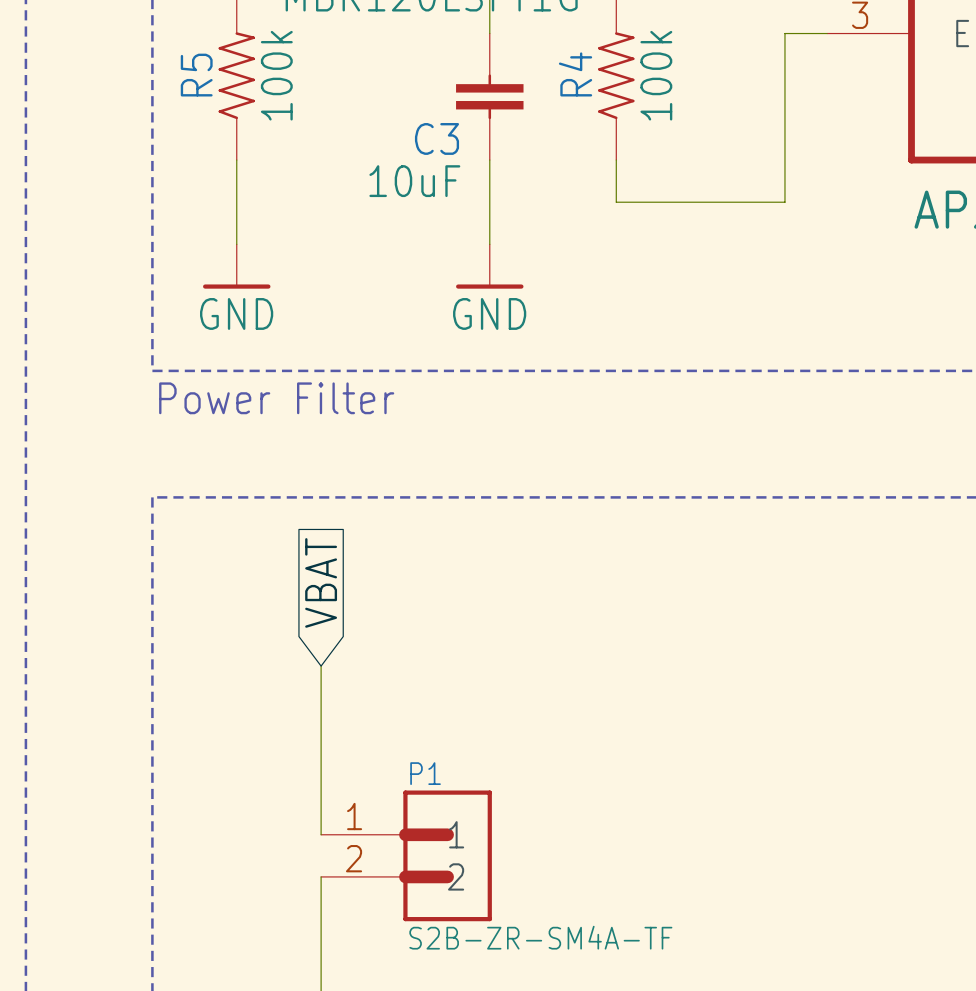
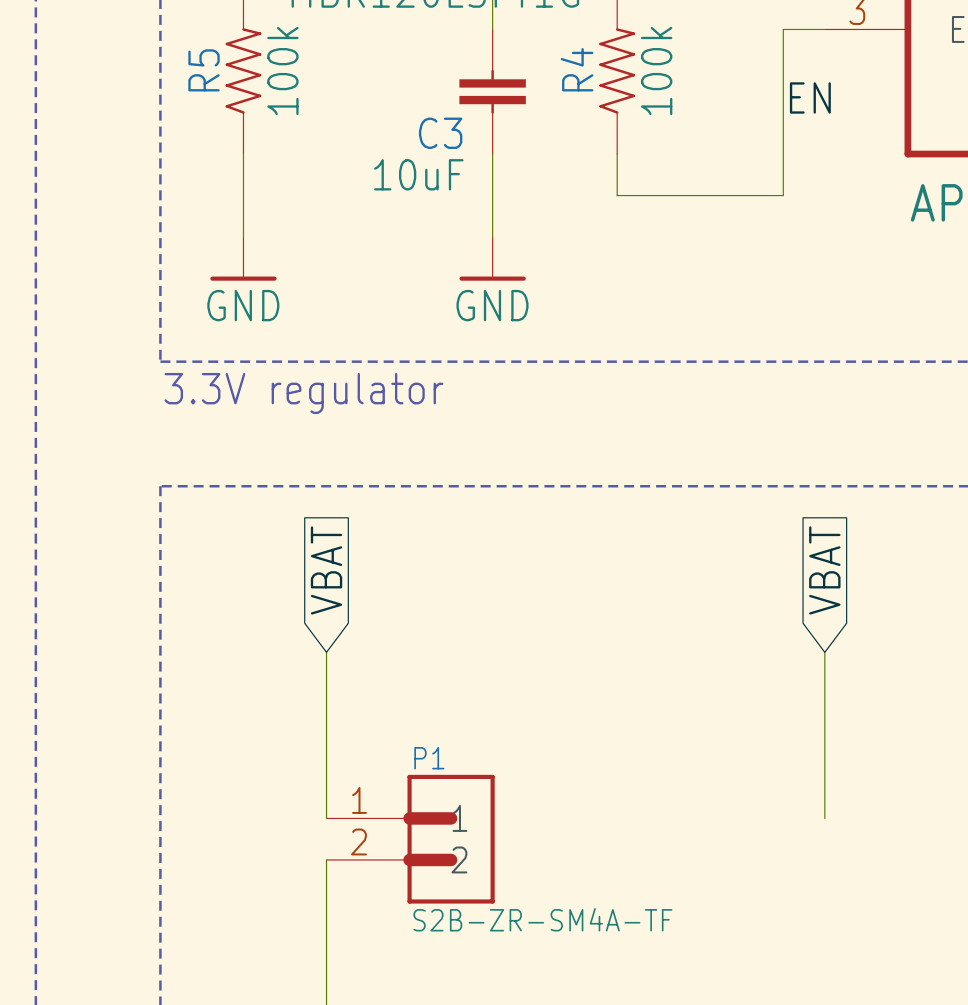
label: none -> EN (810, 97)
text: Power Filter (276, 398) -> 3.3V regulator (303, 393)
global label: none -> VBAT (824, 570)
wire: none -> (824, 652) (824, 818)

